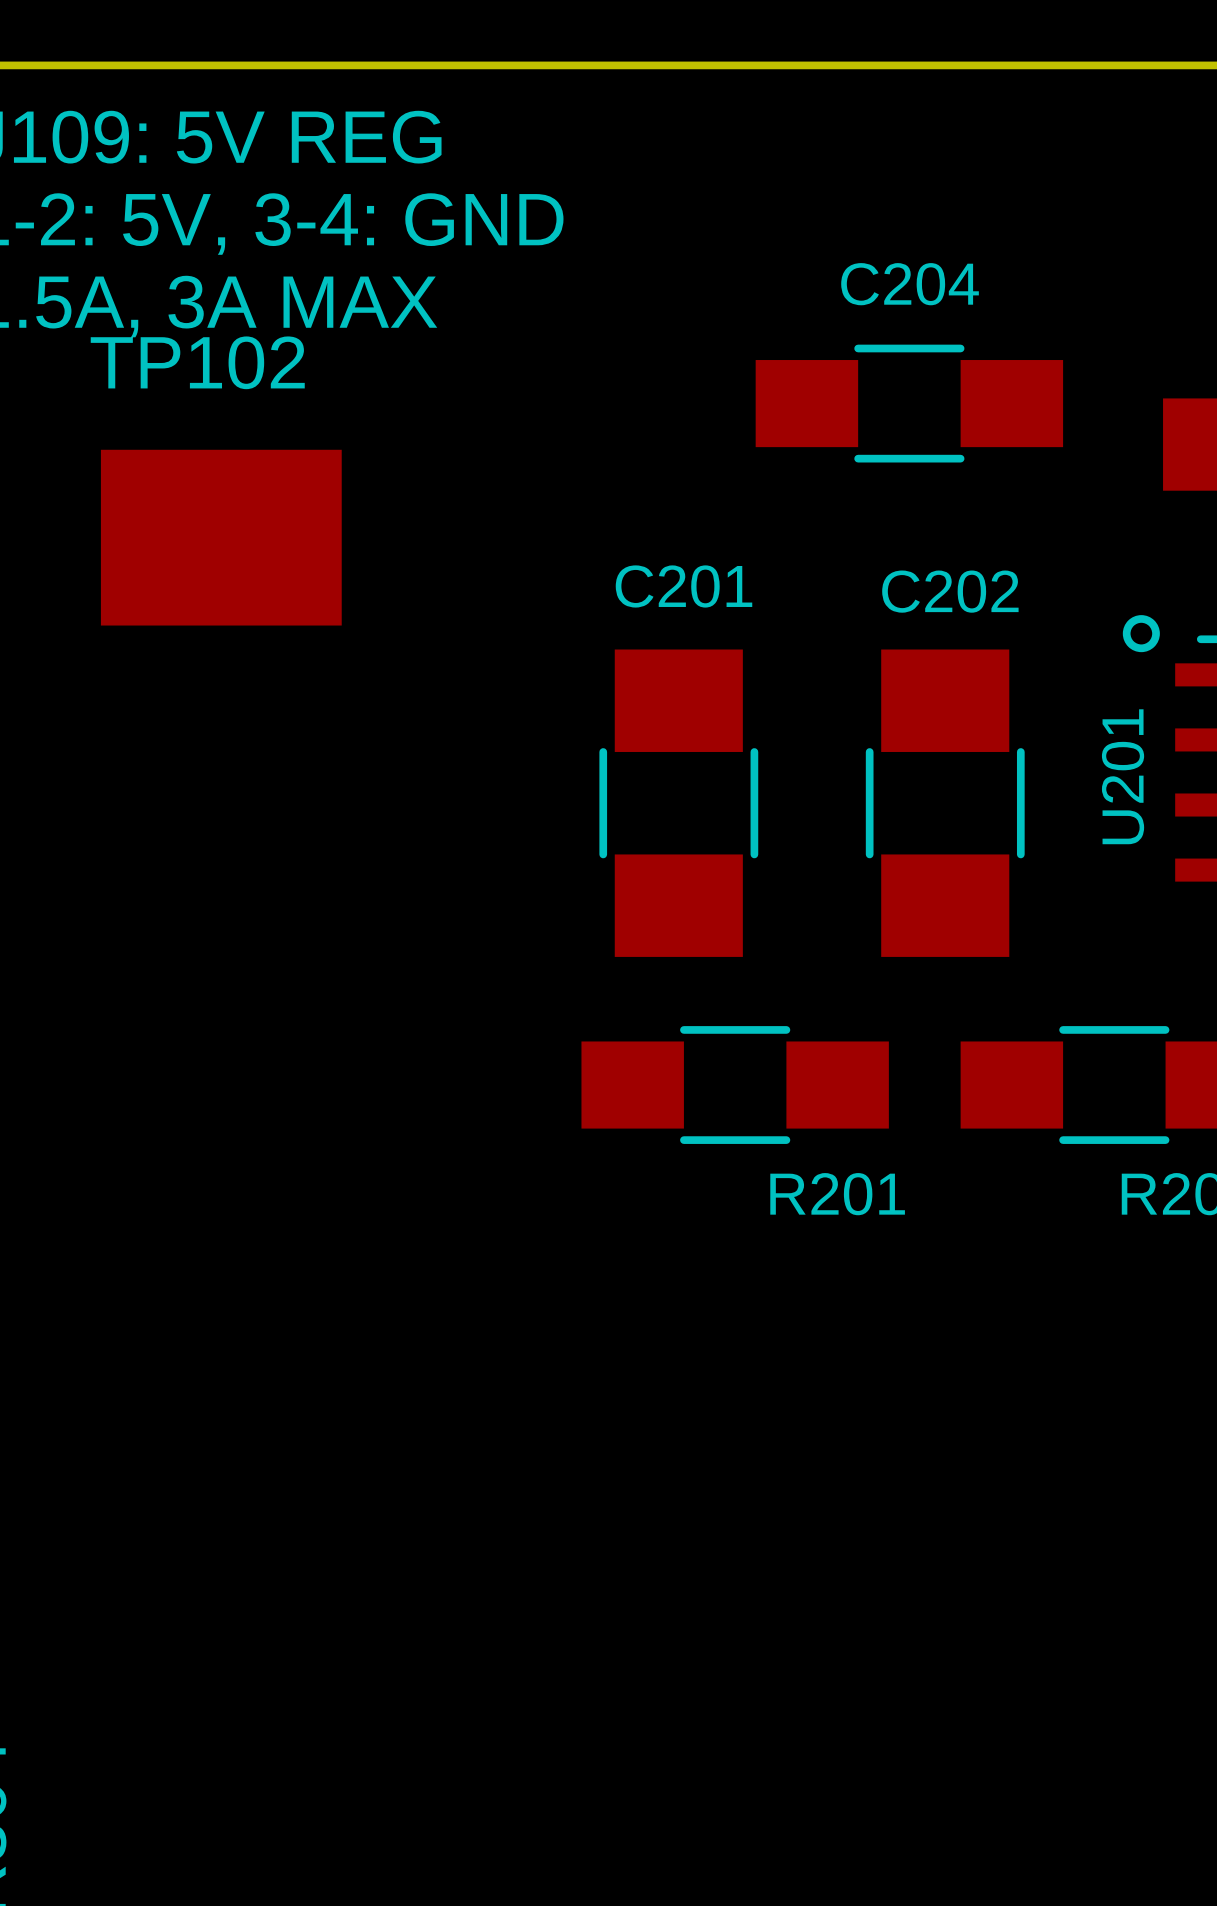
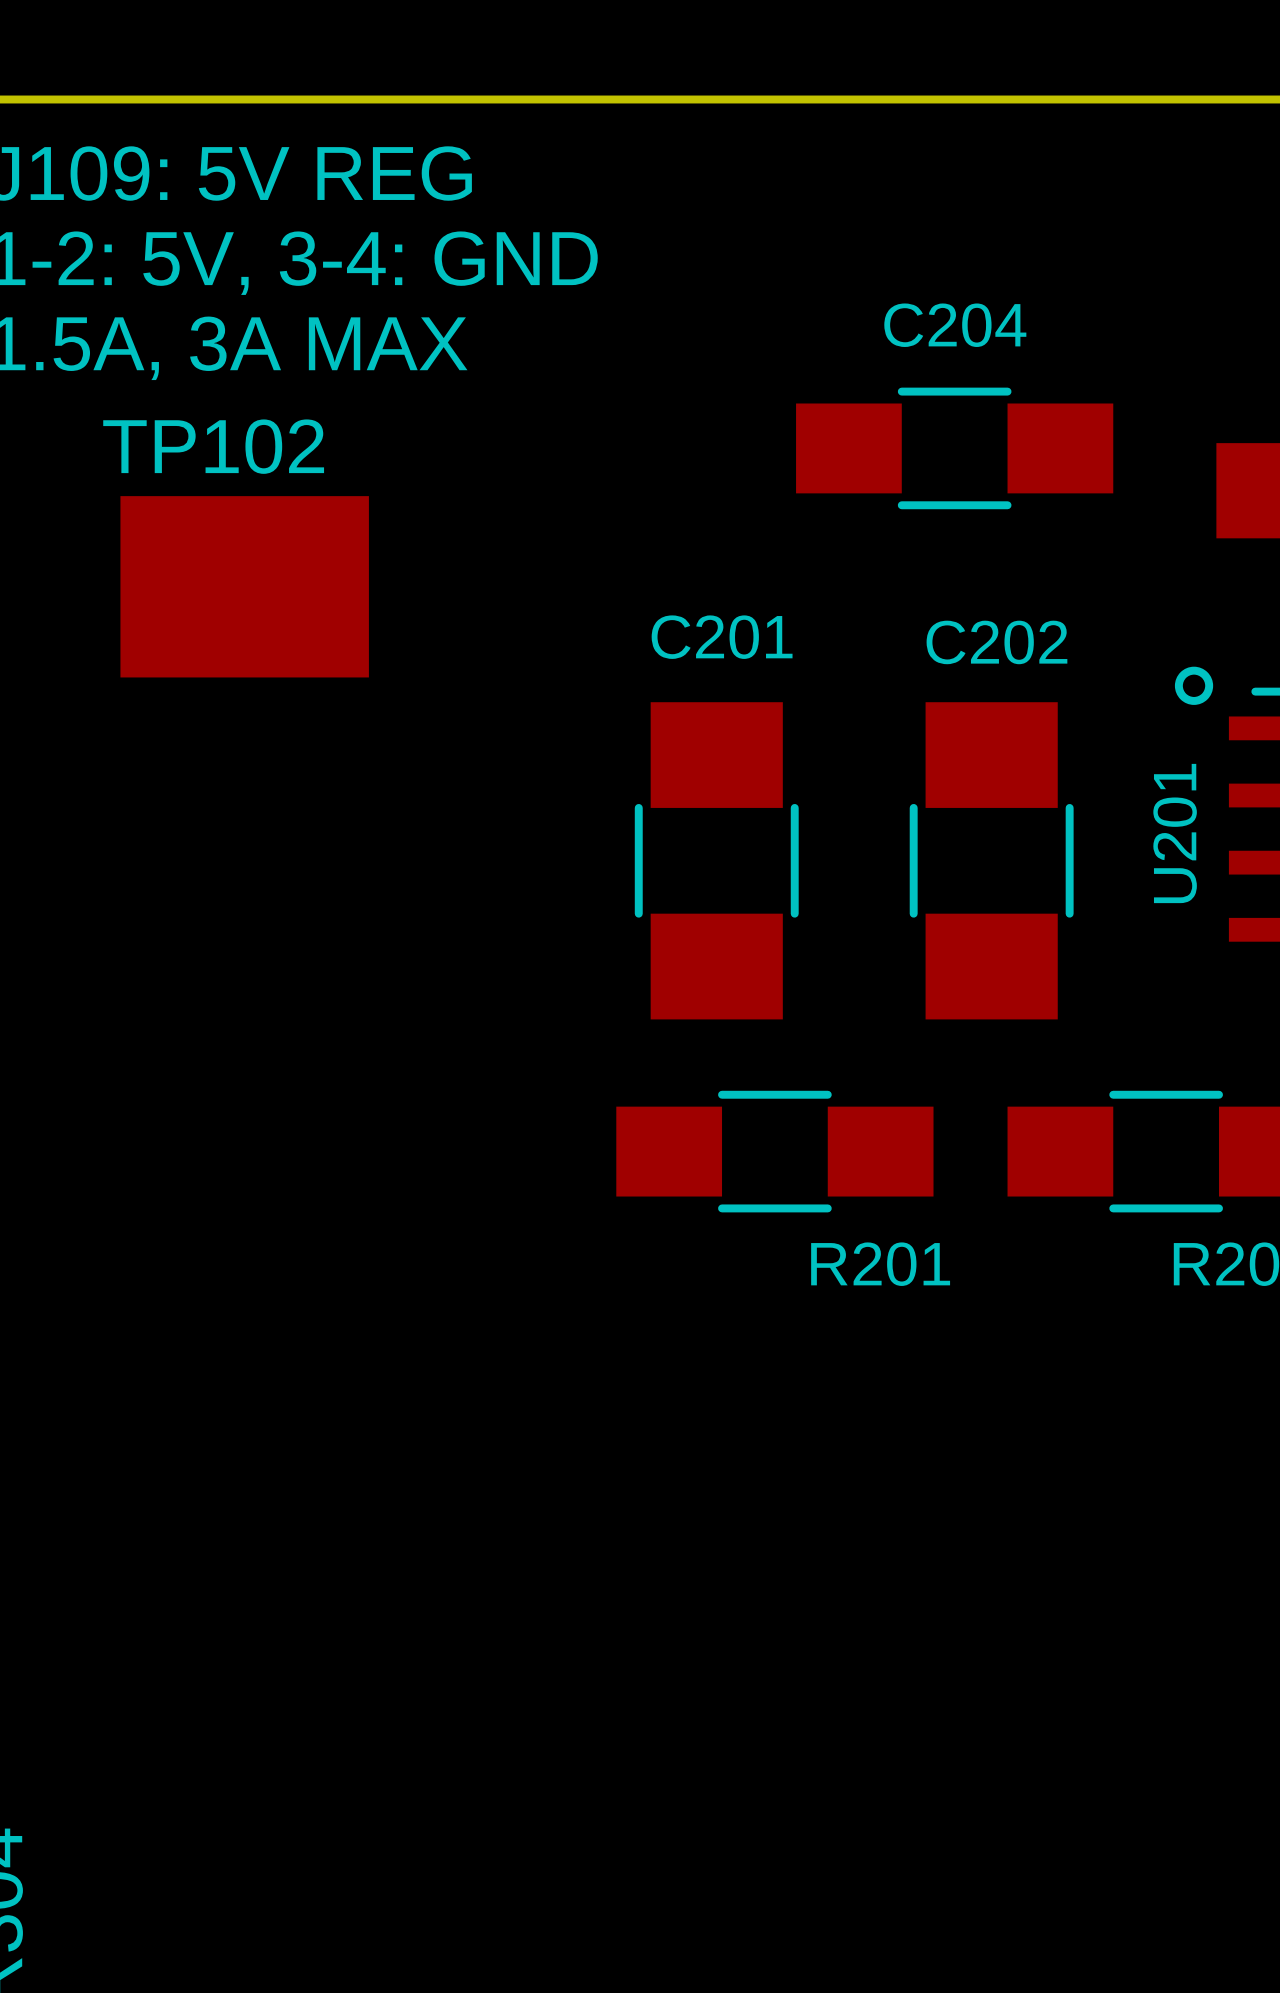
TP102 name position: TP102 (197, 362) -> TP102 (213, 446)

